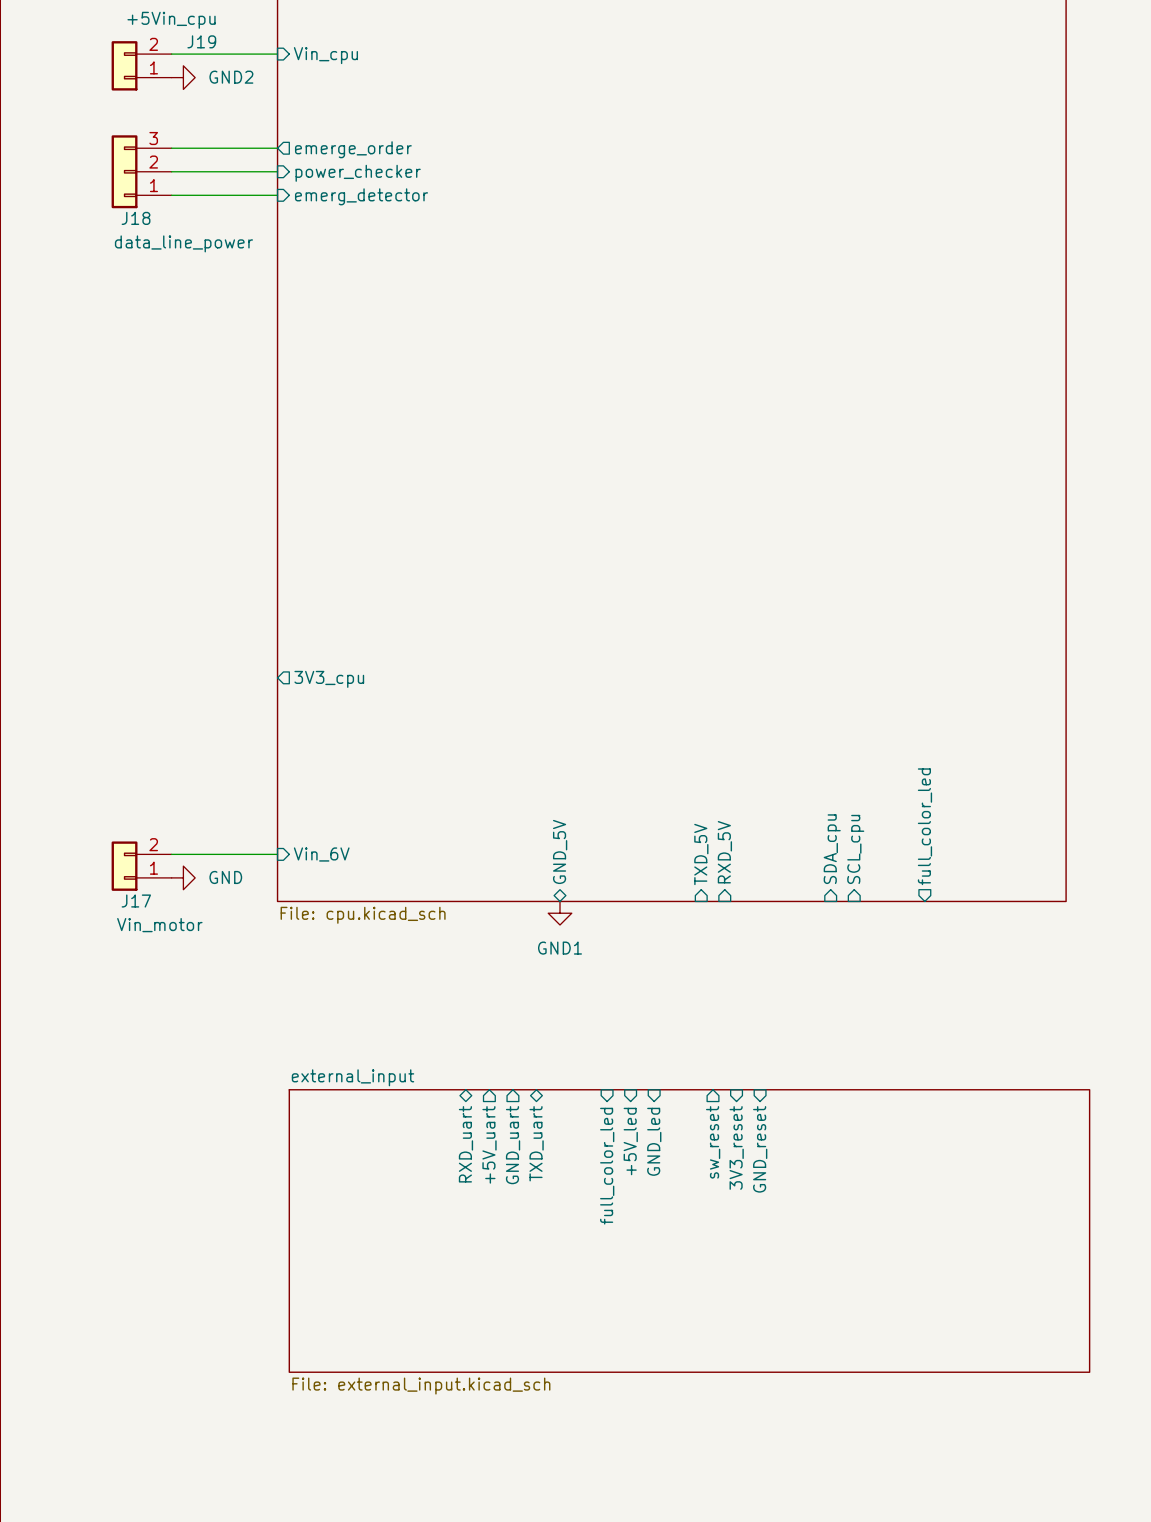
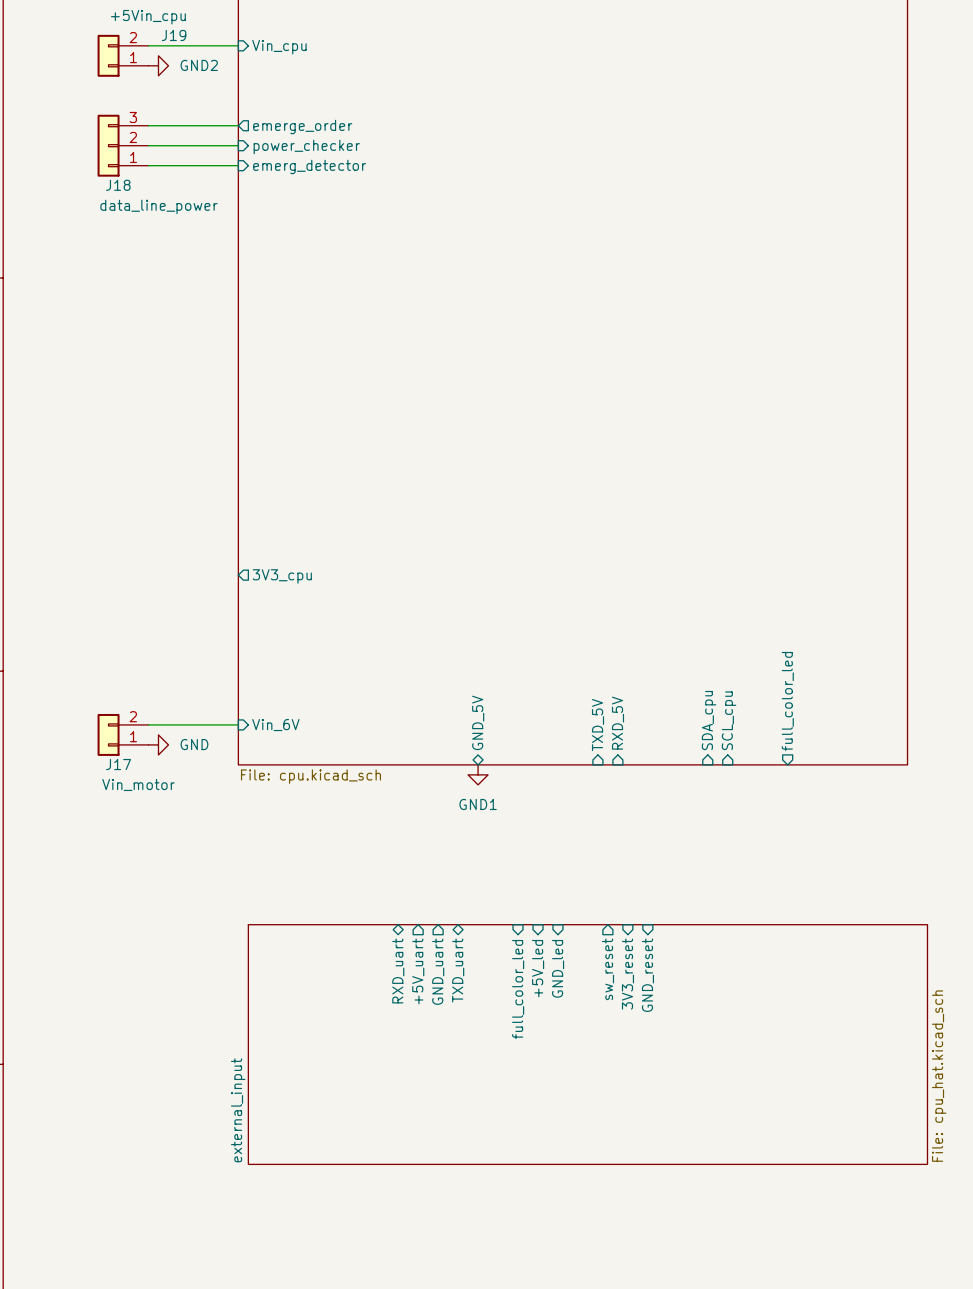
sheet external_input name rotation: 0° (353, 1077) -> 90° counterclockwise (238, 1110)
sheet external_input name position: external_input (353, 1077) -> external_input (238, 1110)
sheet external_input value: File: external_input.kicad_sch (421, 1386) -> File: cpu_hat.kicad_sch (939, 1076)

